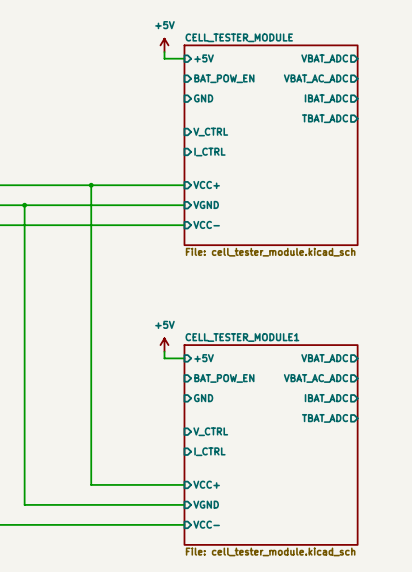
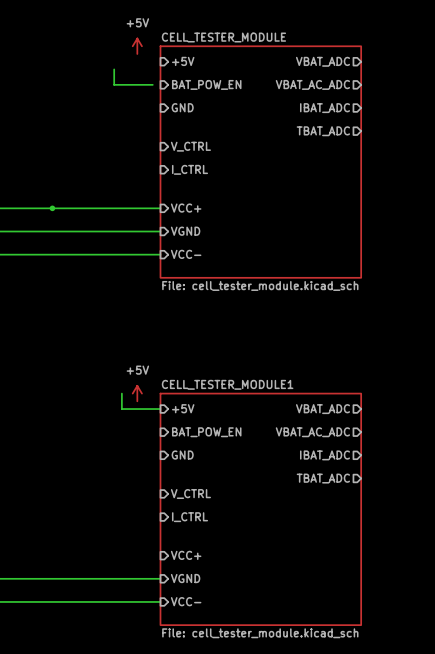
wire: (164, 52) (164, 58) (184, 58) -> none
wire: none -> (114, 69) (114, 84) (152, 84)
wire: (91, 185) (91, 484) (184, 484) -> none
wire: (164, 351) (164, 358) -> (121, 393) (121, 409) (137, 409)

